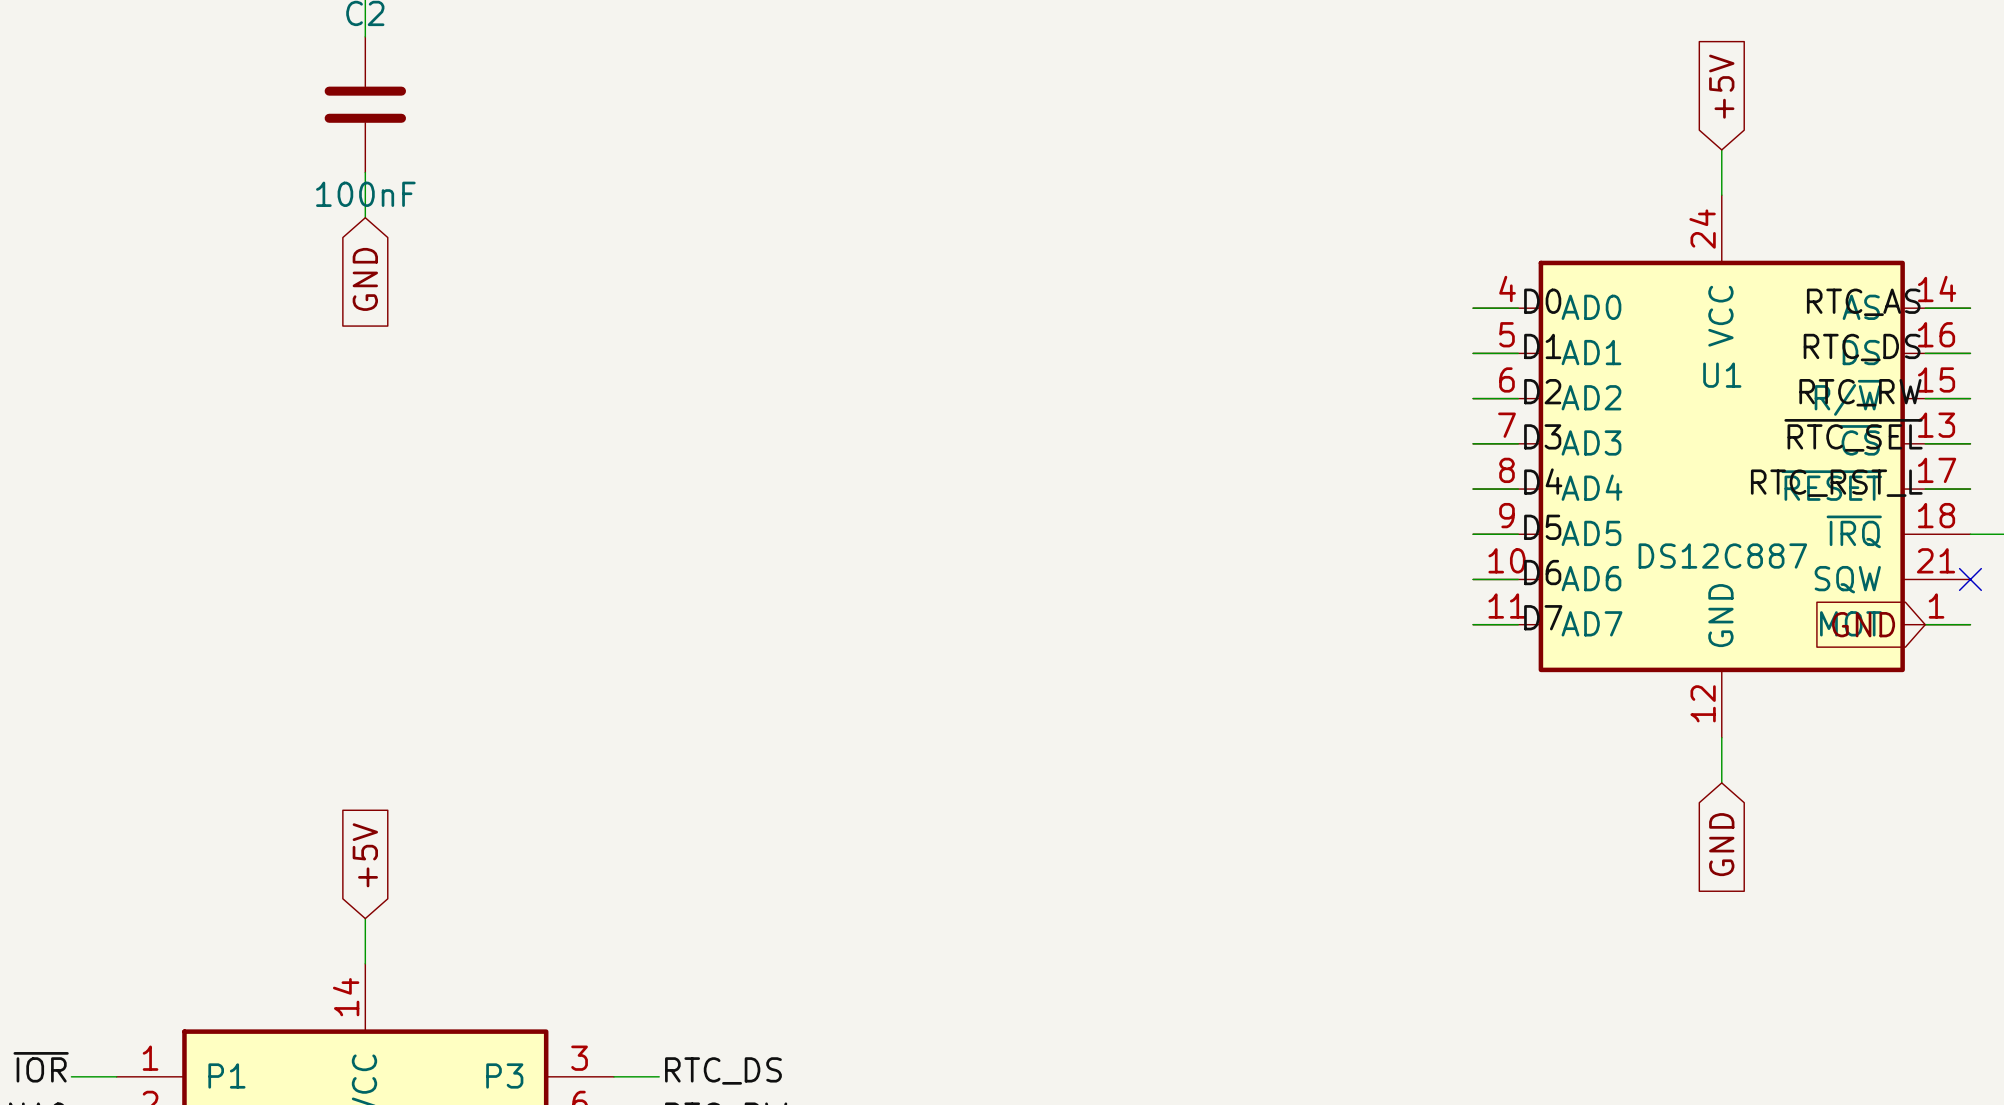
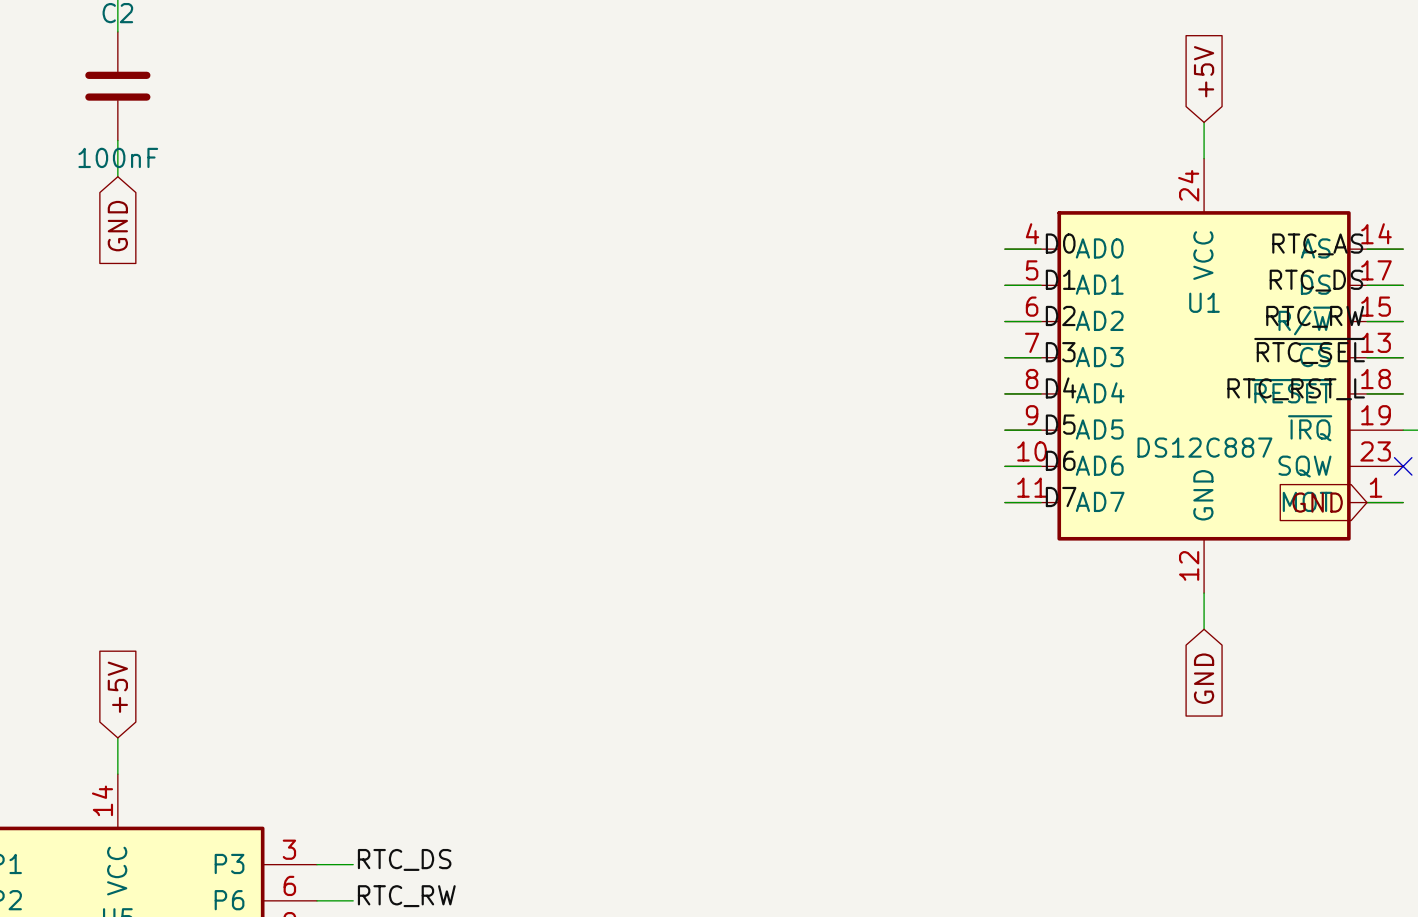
U1 pin number: 16 (1936, 334) -> 17 (1376, 270)
U1 pin number: 17 (1937, 470) -> 18 (1376, 379)
U1 pin number: 18 (1936, 515) -> 19 (1376, 415)
U1 pin number: 21 (1936, 560) -> 23 (1375, 451)

